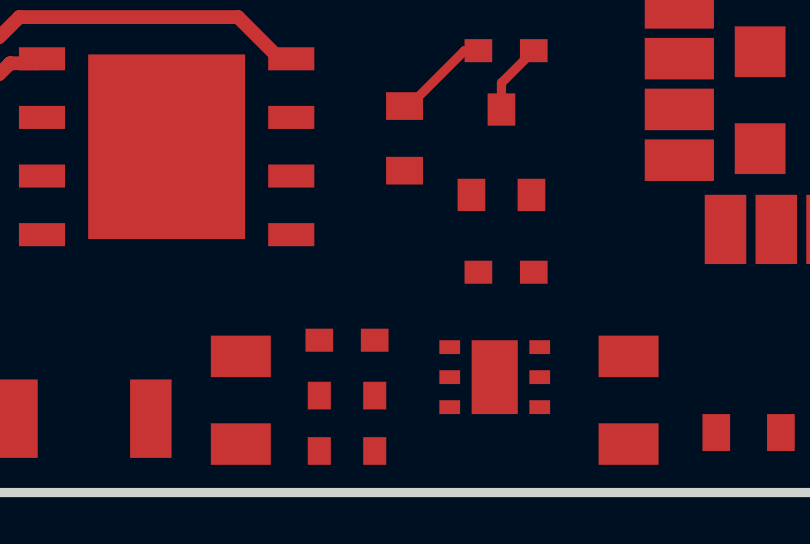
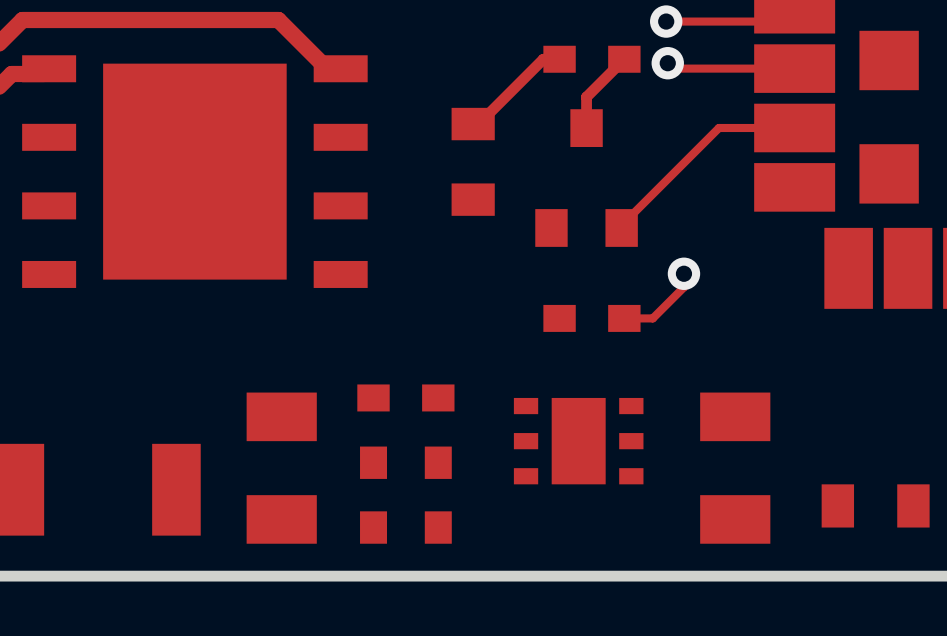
top track: none -> (794, 9) (782, 21) (666, 21)
via: none -> (666, 21)
top track: none -> (667, 63) (673, 68) (794, 68)
via: none -> (667, 63)
top track: none -> (794, 127) (718, 127) (621, 225) (621, 227)
top track: none -> (683, 273) (683, 287) (652, 318) (624, 318)
via: none -> (683, 273)

